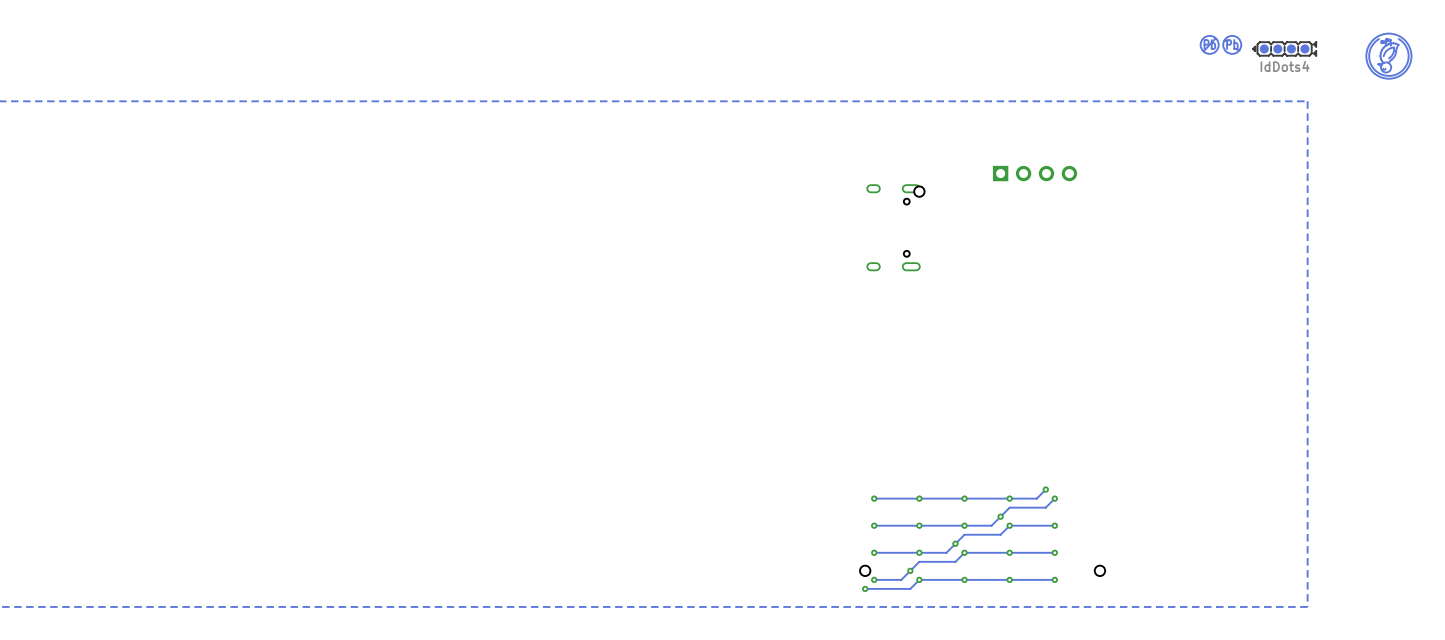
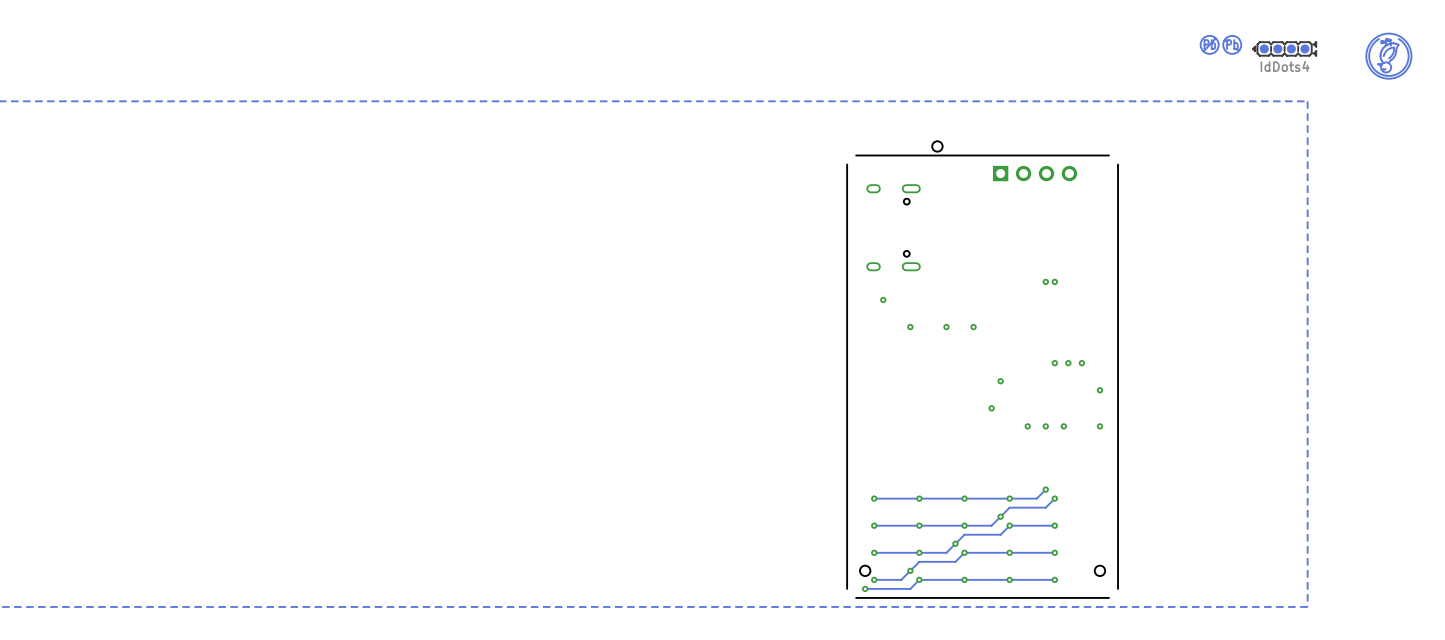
board edge: none -> (1108, 155) (856, 155)
board edge: none -> (847, 164) (847, 588)
board edge: none -> (1118, 164) (1118, 588)
part position: (919, 191) -> (937, 146)
via: none -> (1045, 281)
via: none -> (1054, 281)
via: none -> (883, 299)
via: none -> (910, 327)
via: none -> (946, 327)
via: none -> (973, 327)
via: none -> (1054, 363)
via: none -> (1068, 363)
via: none -> (1081, 363)
via: none -> (1000, 381)
via: none -> (1099, 390)
via: none -> (991, 408)
via: none -> (1027, 426)
via: none -> (1045, 426)
via: none -> (1063, 426)
via: none -> (1099, 426)
board edge: none -> (1108, 597) (856, 597)

